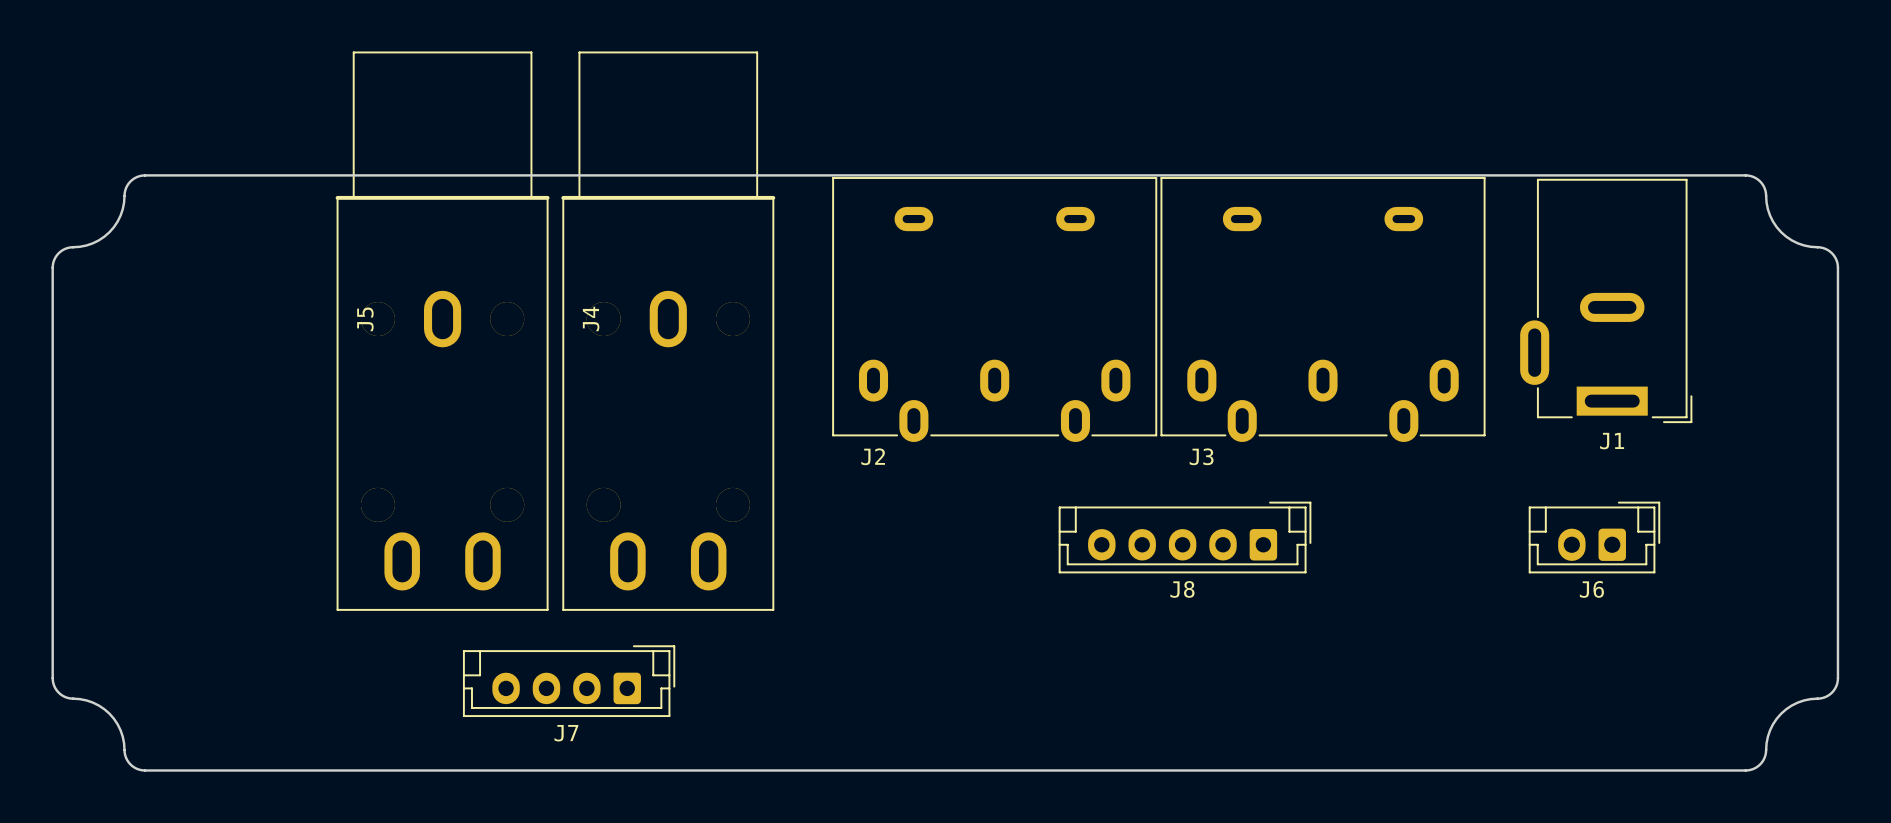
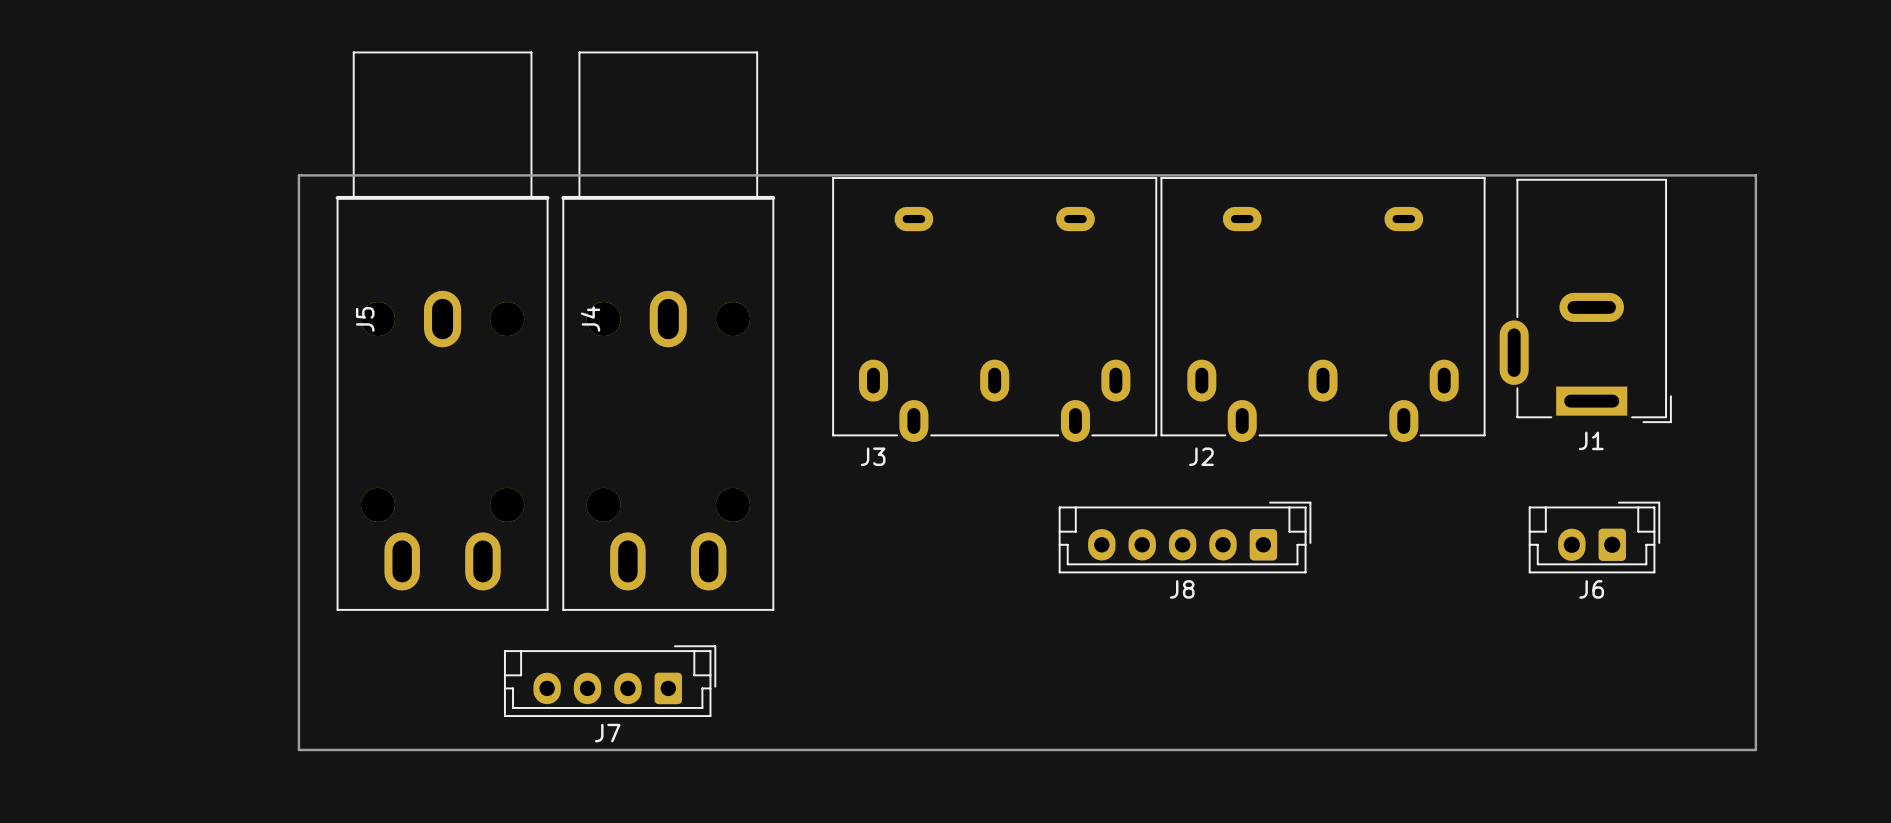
board edge: (298, 175) (139, 176) (132, 179) (127, 185) (120, 215) (109, 232) (92, 243) (73, 247) -> none
board edge: (1745, 175) (1755, 178) (1763, 185) (1770, 215) (1781, 232) (1797, 243) (1827, 249) (1835, 257) (1837, 267) (1837, 680) (1833, 690) (1827, 695) (1797, 702) (1781, 713) (1770, 730) (1763, 760) (1755, 767) (1745, 770) (139, 769) (132, 766) (127, 760) (120, 730) (109, 713) (92, 702) (62, 695) (55, 688) (52, 680) (52, 267) (54, 259) (58, 253) (65, 248) (73, 247) -> (1745, 175) (1755, 175) (1755, 749) (298, 749) (298, 175)
J1 position: (1606, 300) -> (1585, 300)
J2 name: J2 (873, 456) -> J3 (873, 456)
J3 name: J3 (1201, 456) -> J2 (1201, 456)
J7 position: (569, 681) -> (610, 681)

